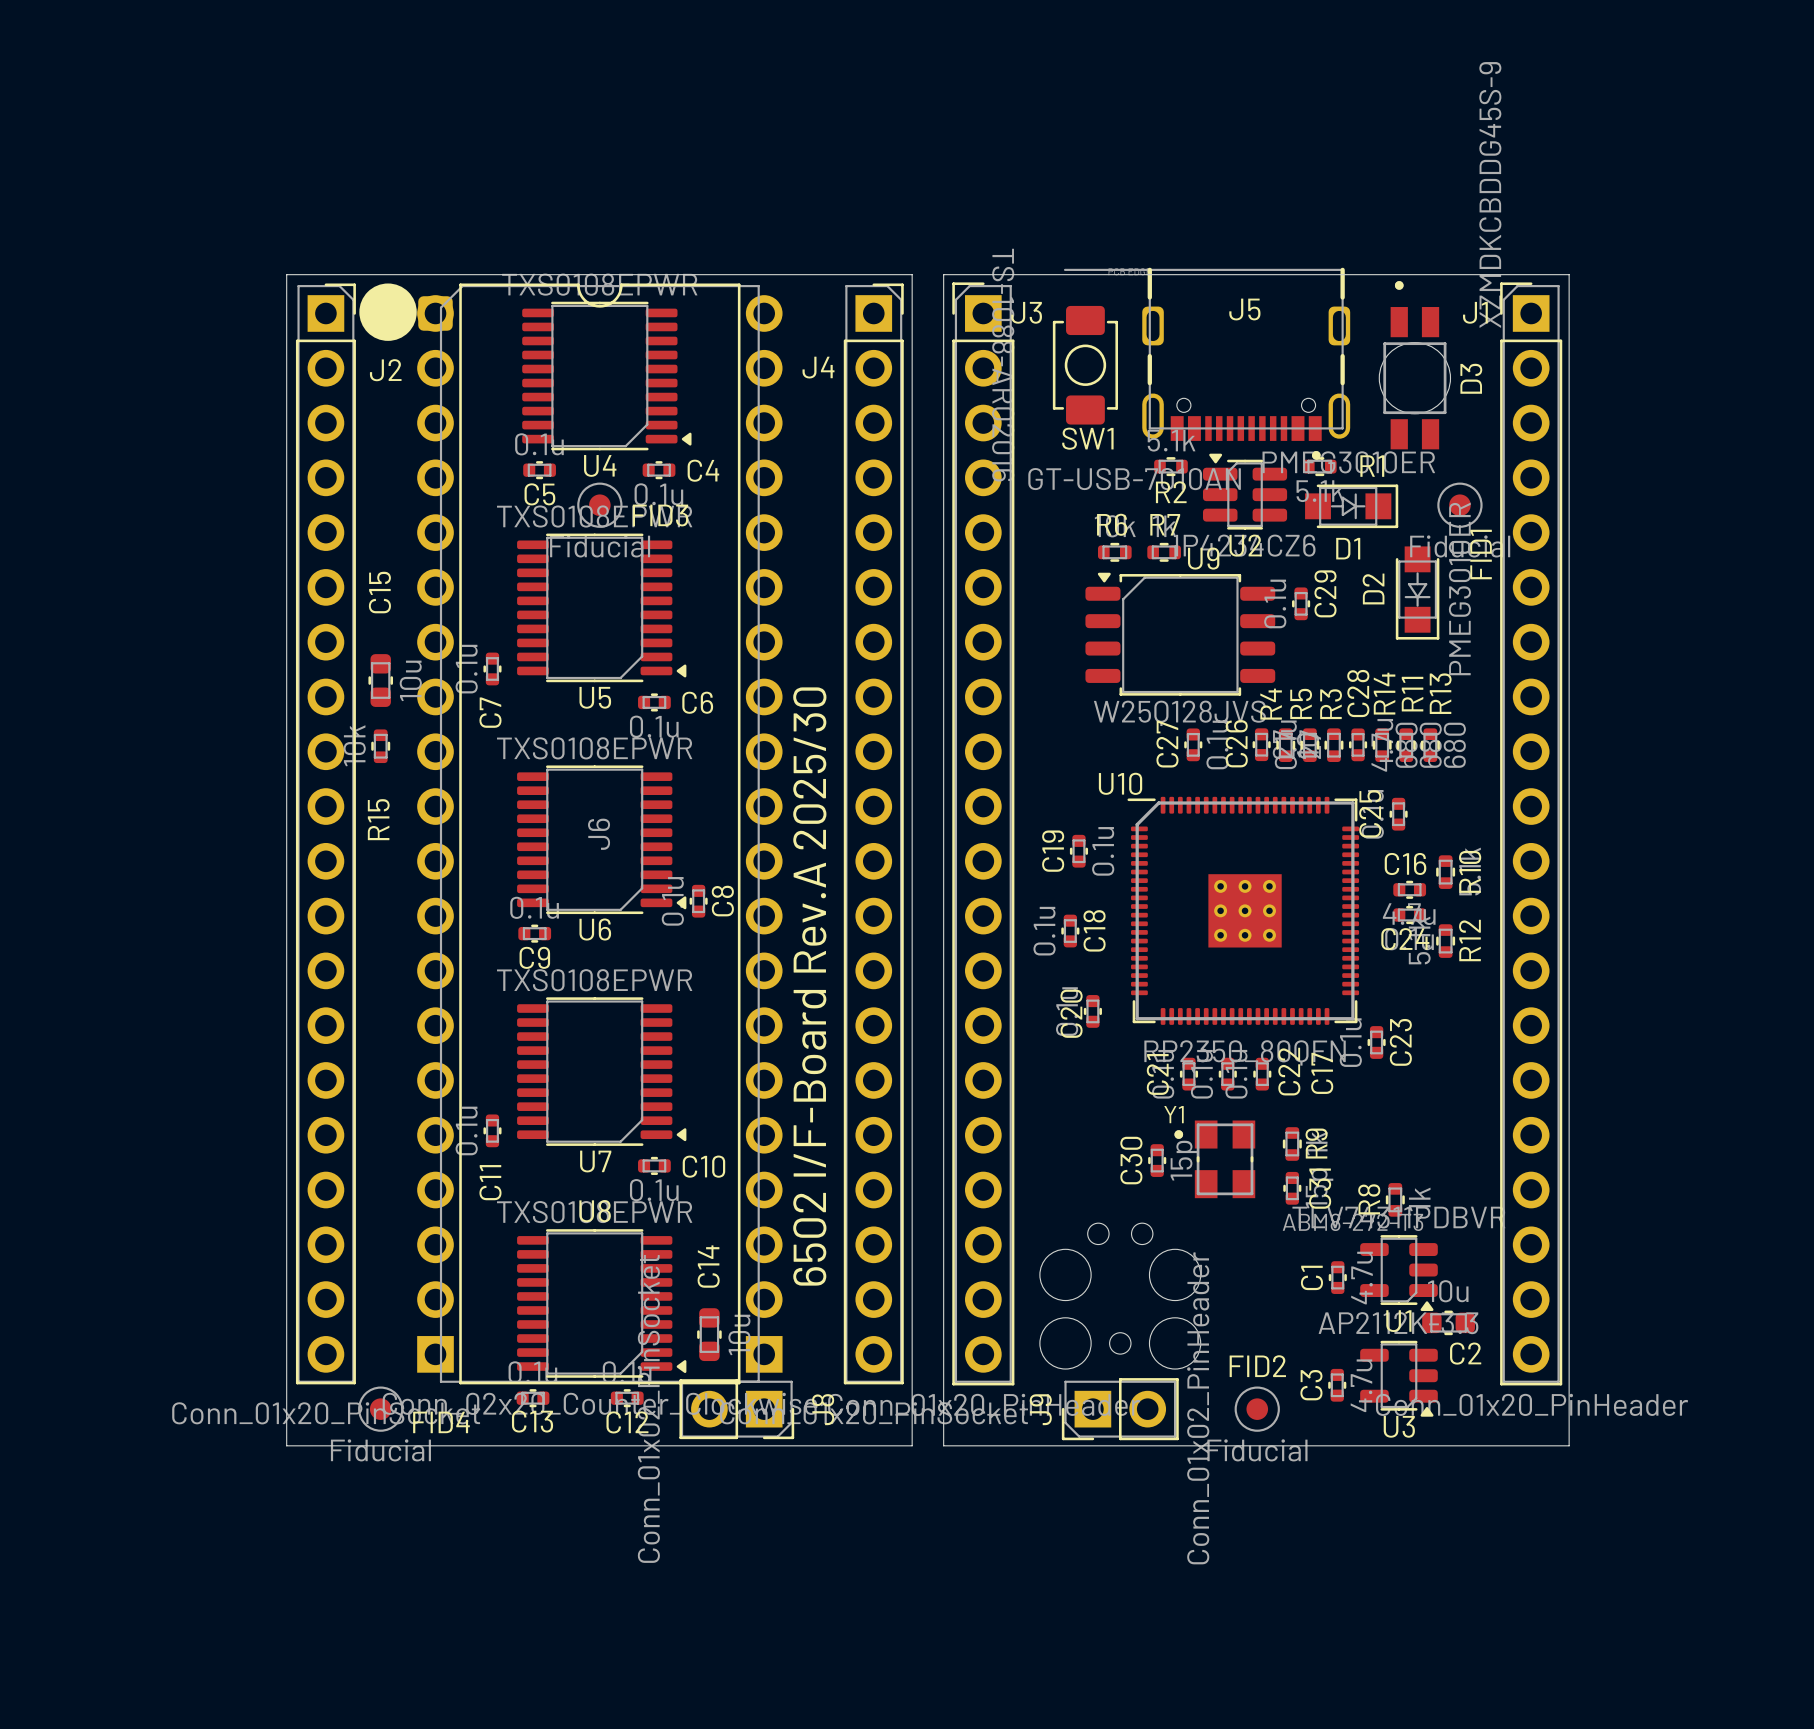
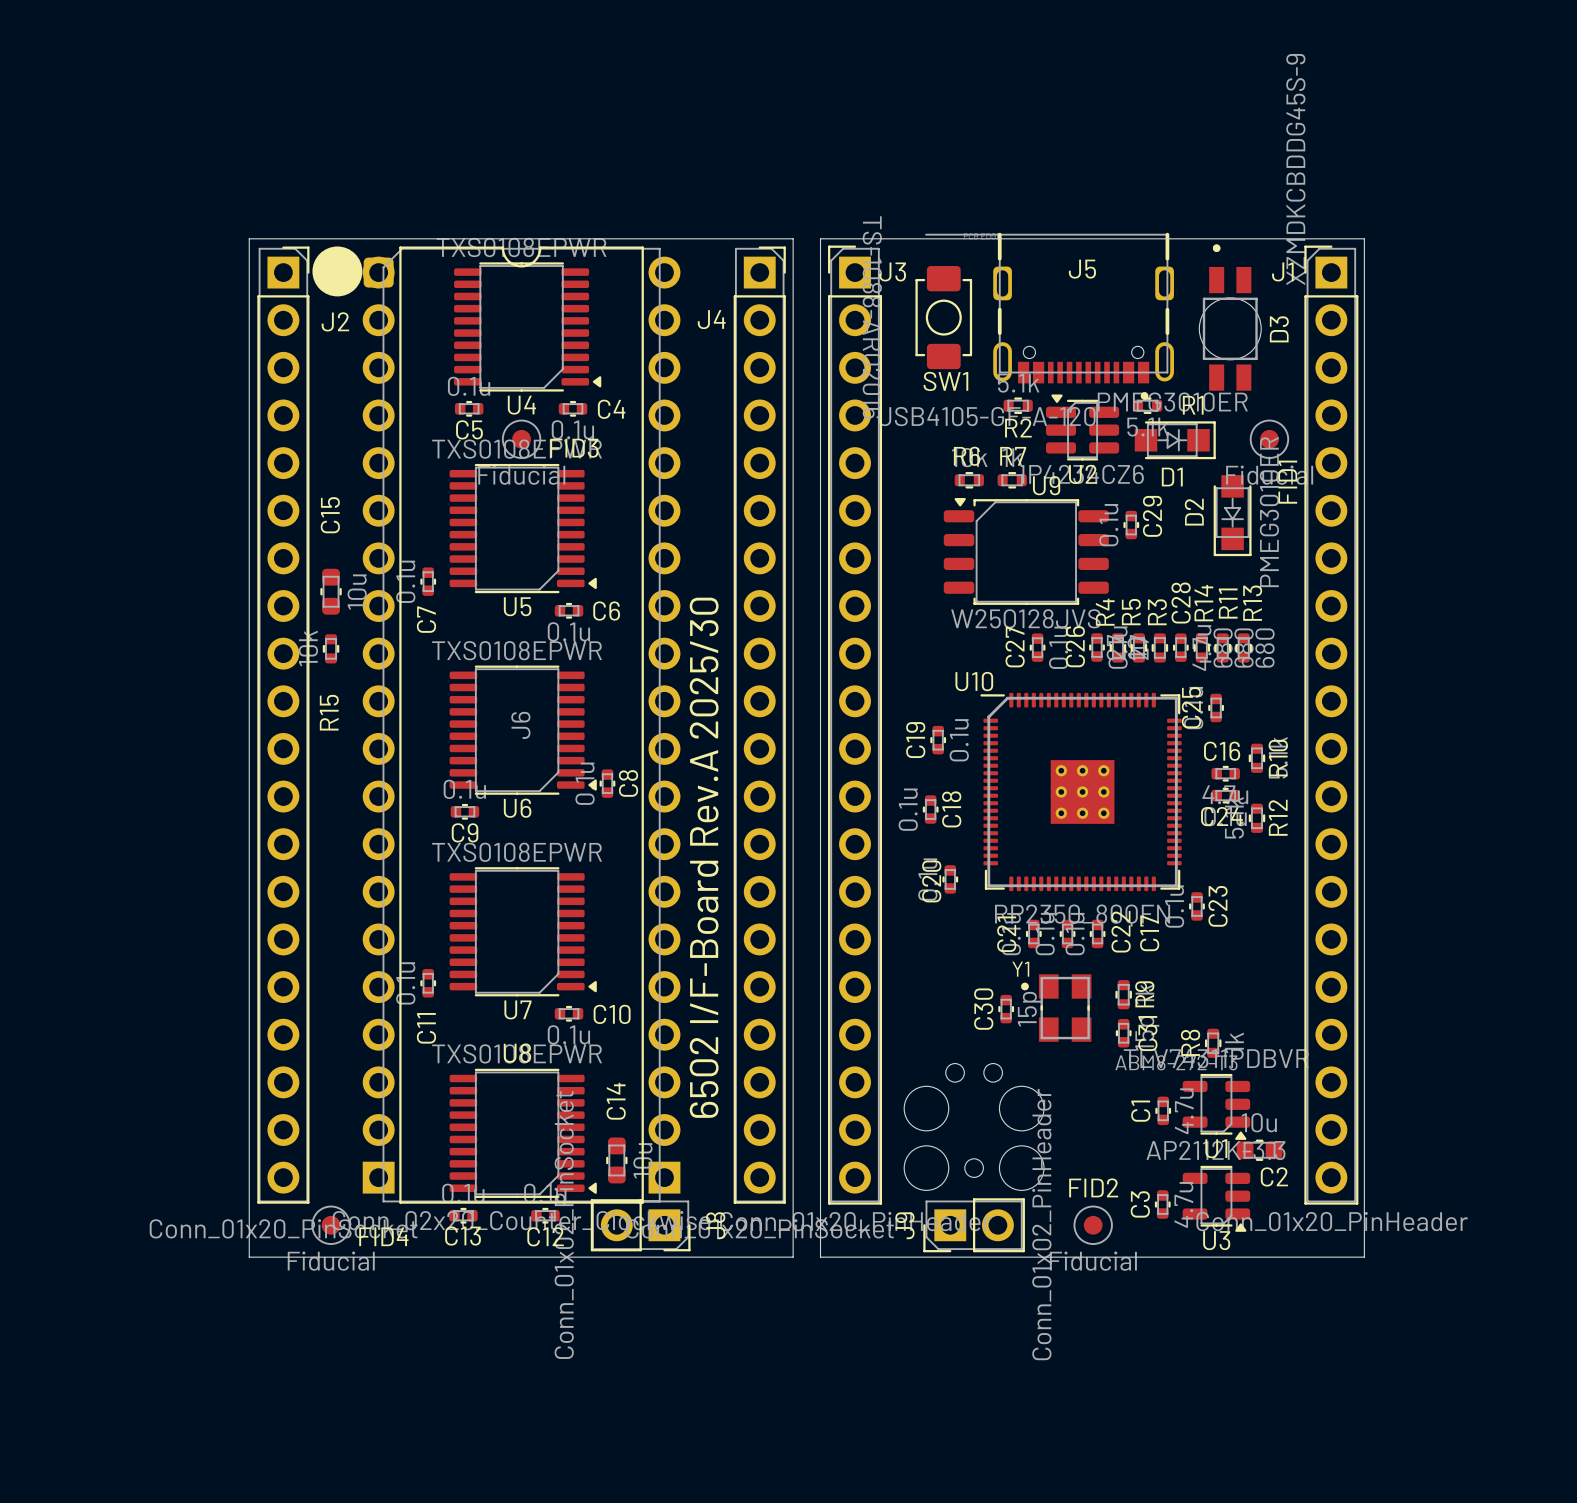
J5 value: GT-USB-7010AN (1134, 479) -> USB4105-GF-A-120 (987, 416)

